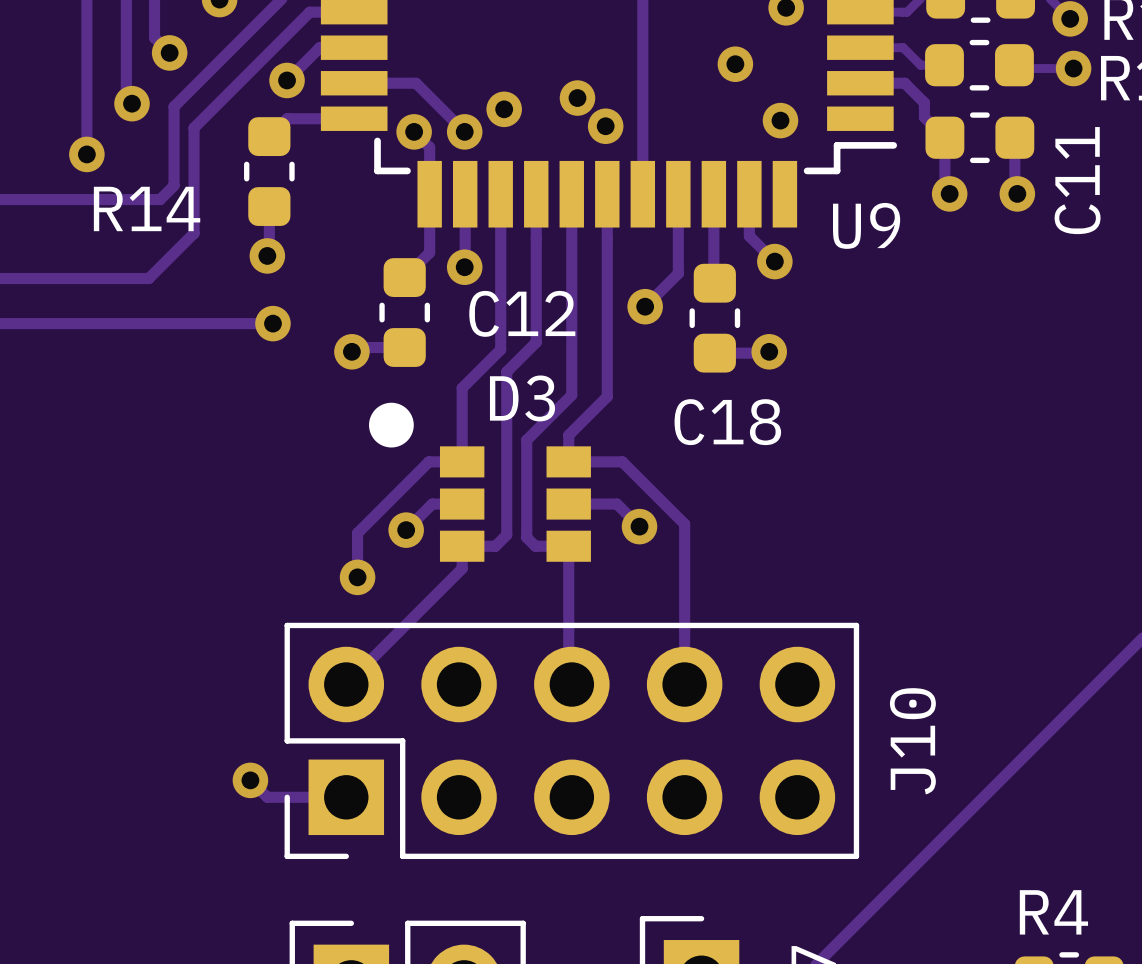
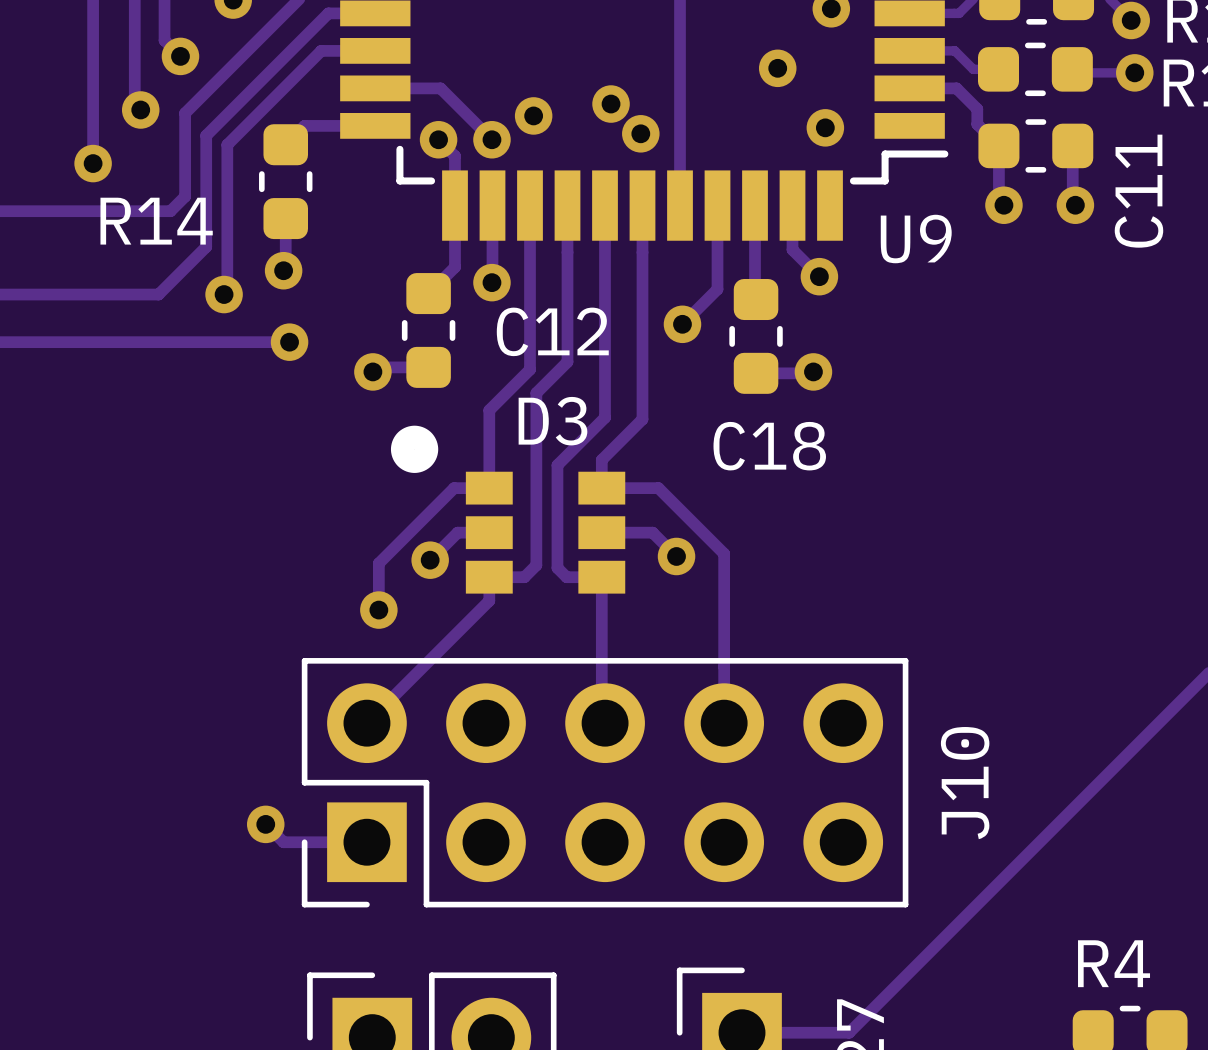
track: (319, 47) (287, 80) -> (338, 50) (321, 50) (227, 144) (227, 291) (224, 294)
via: (287, 80) -> none
via: none -> (224, 294)

